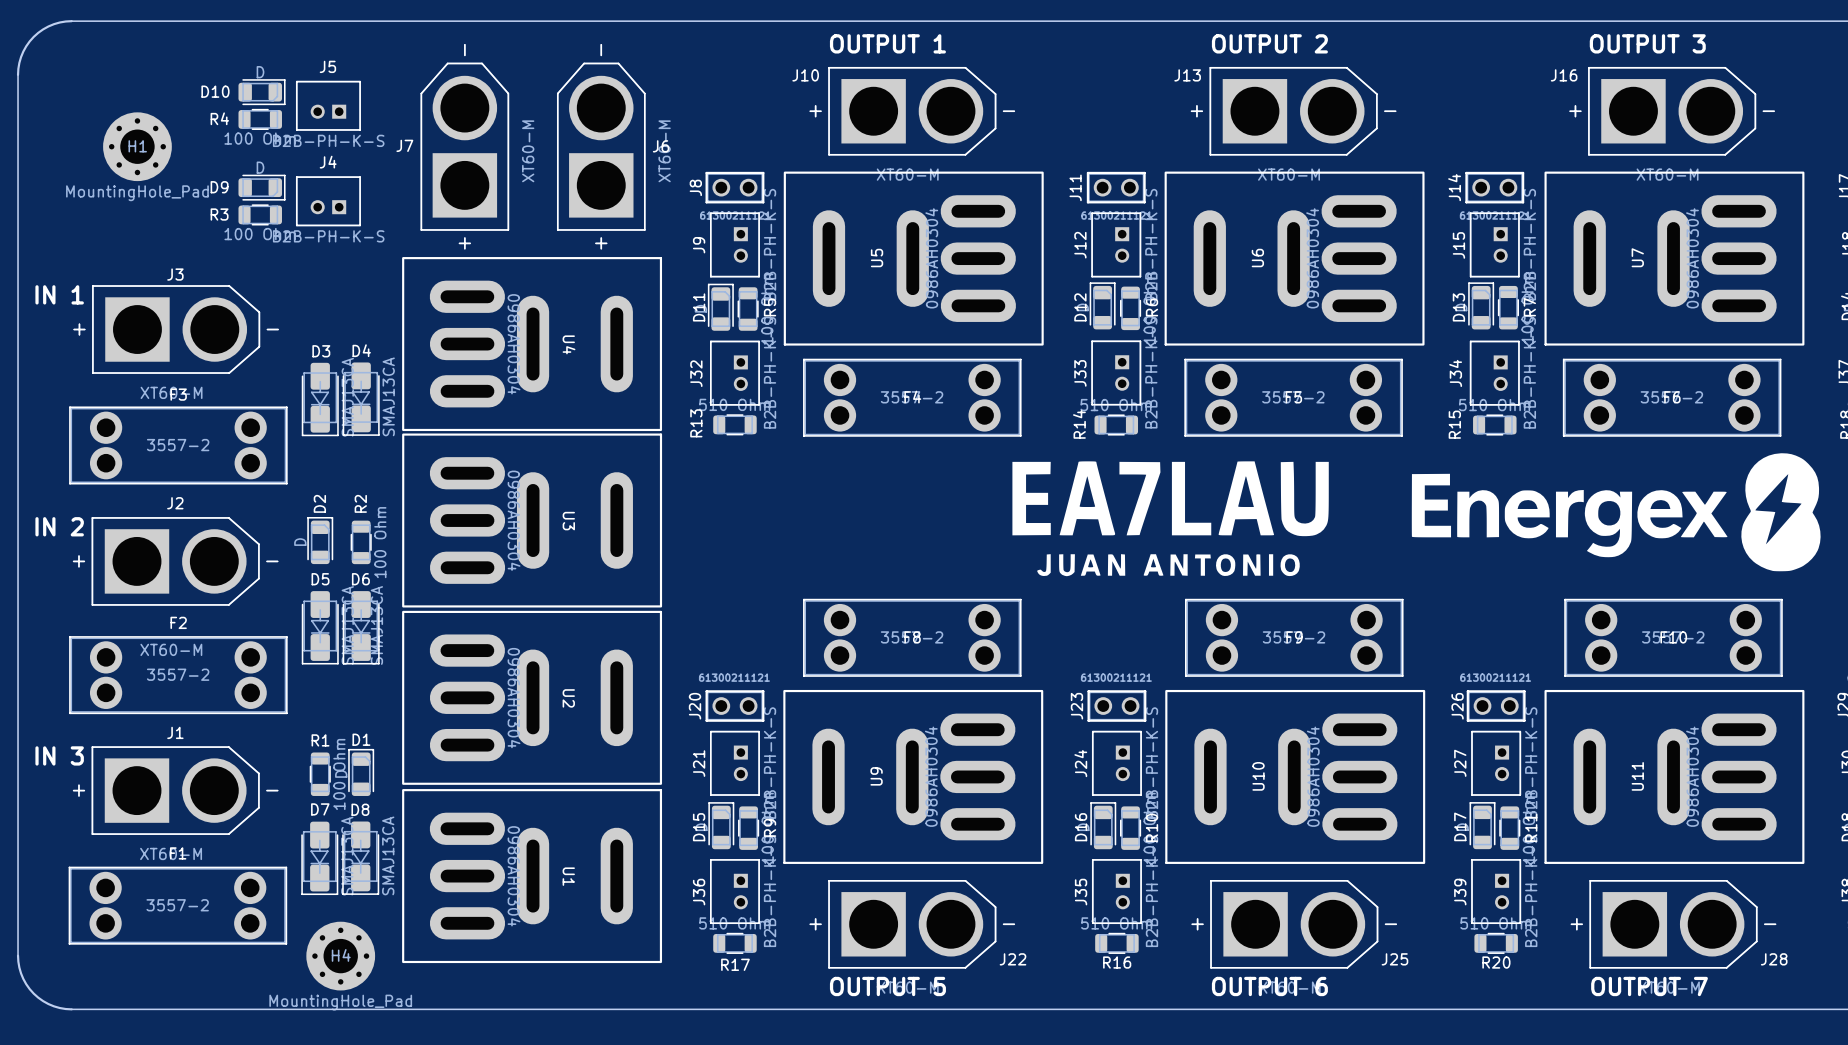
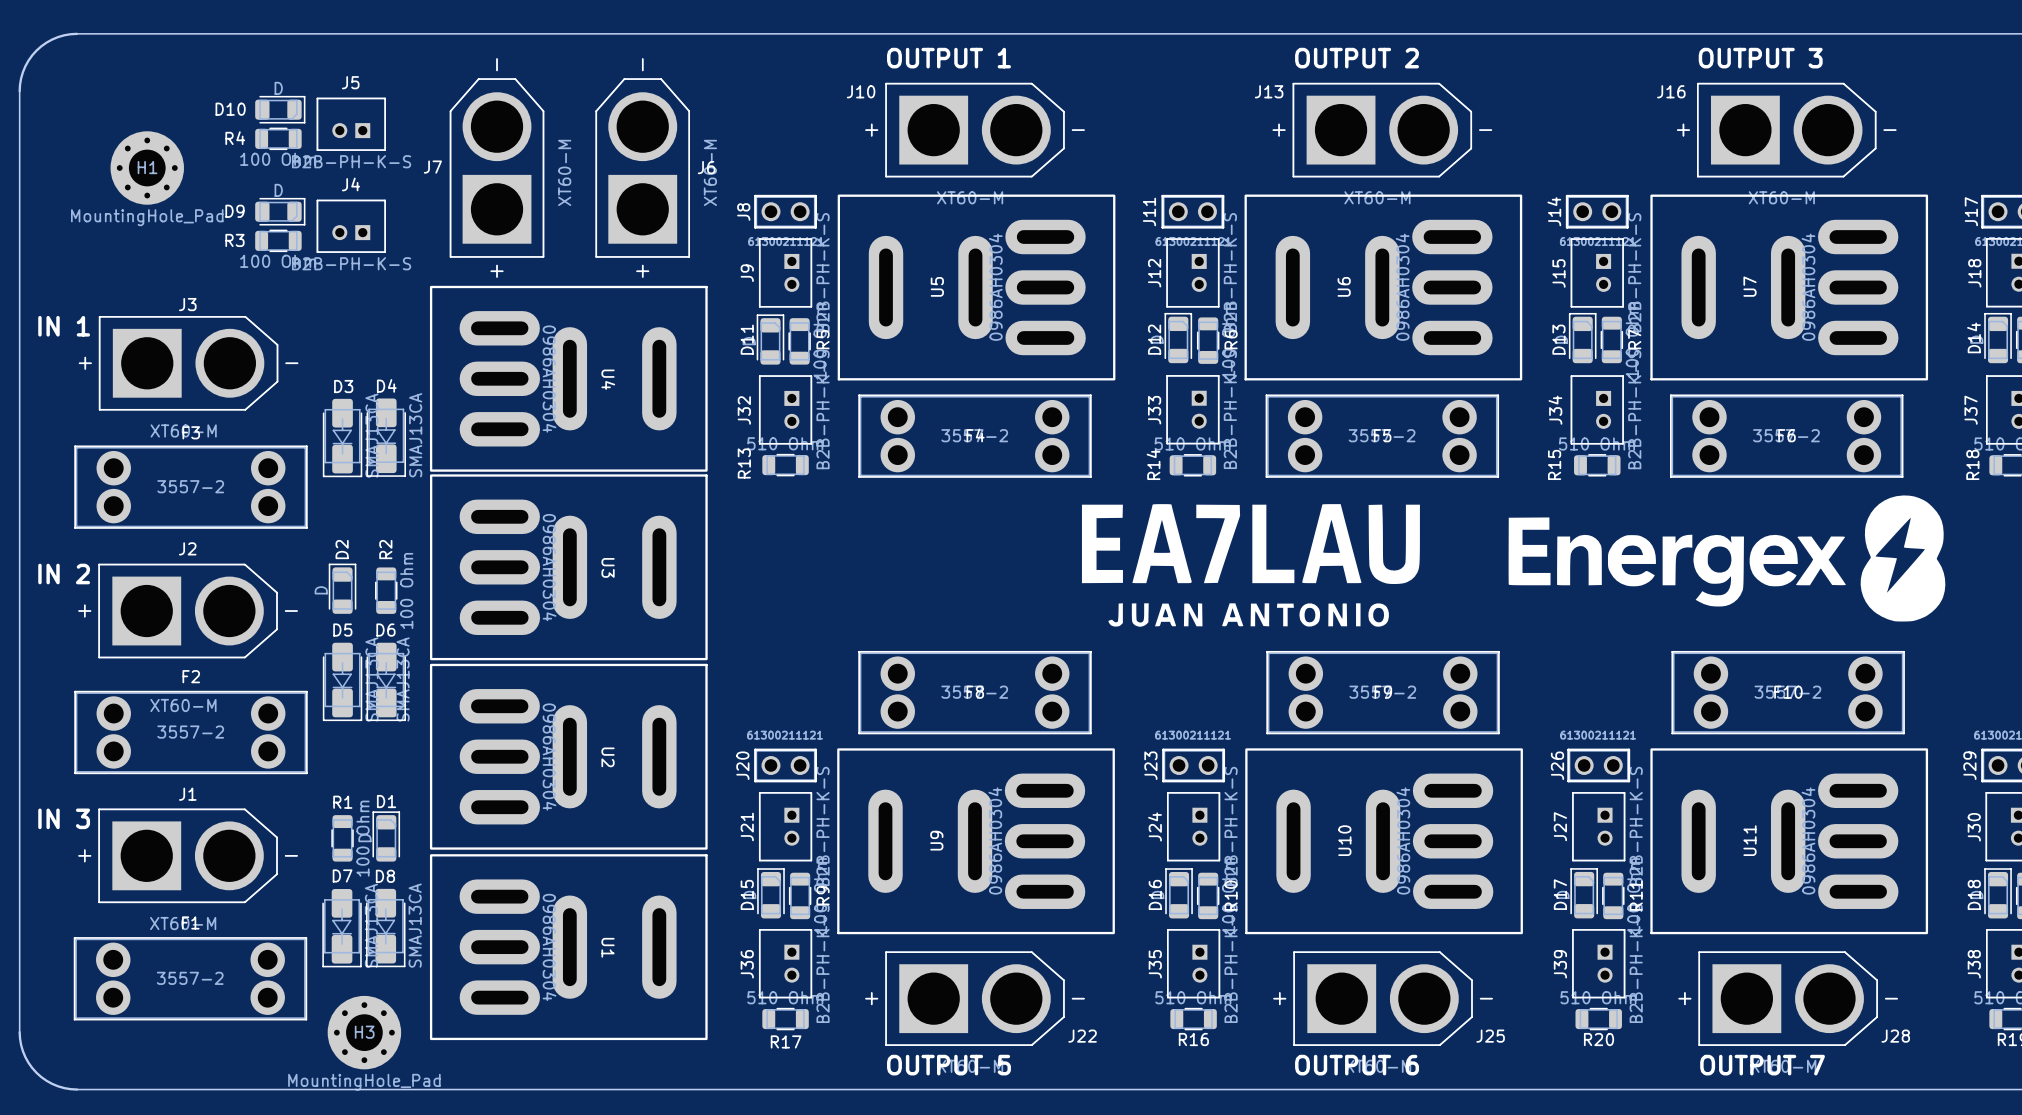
H4 name: H4 (341, 955) -> H3 (364, 1032)

